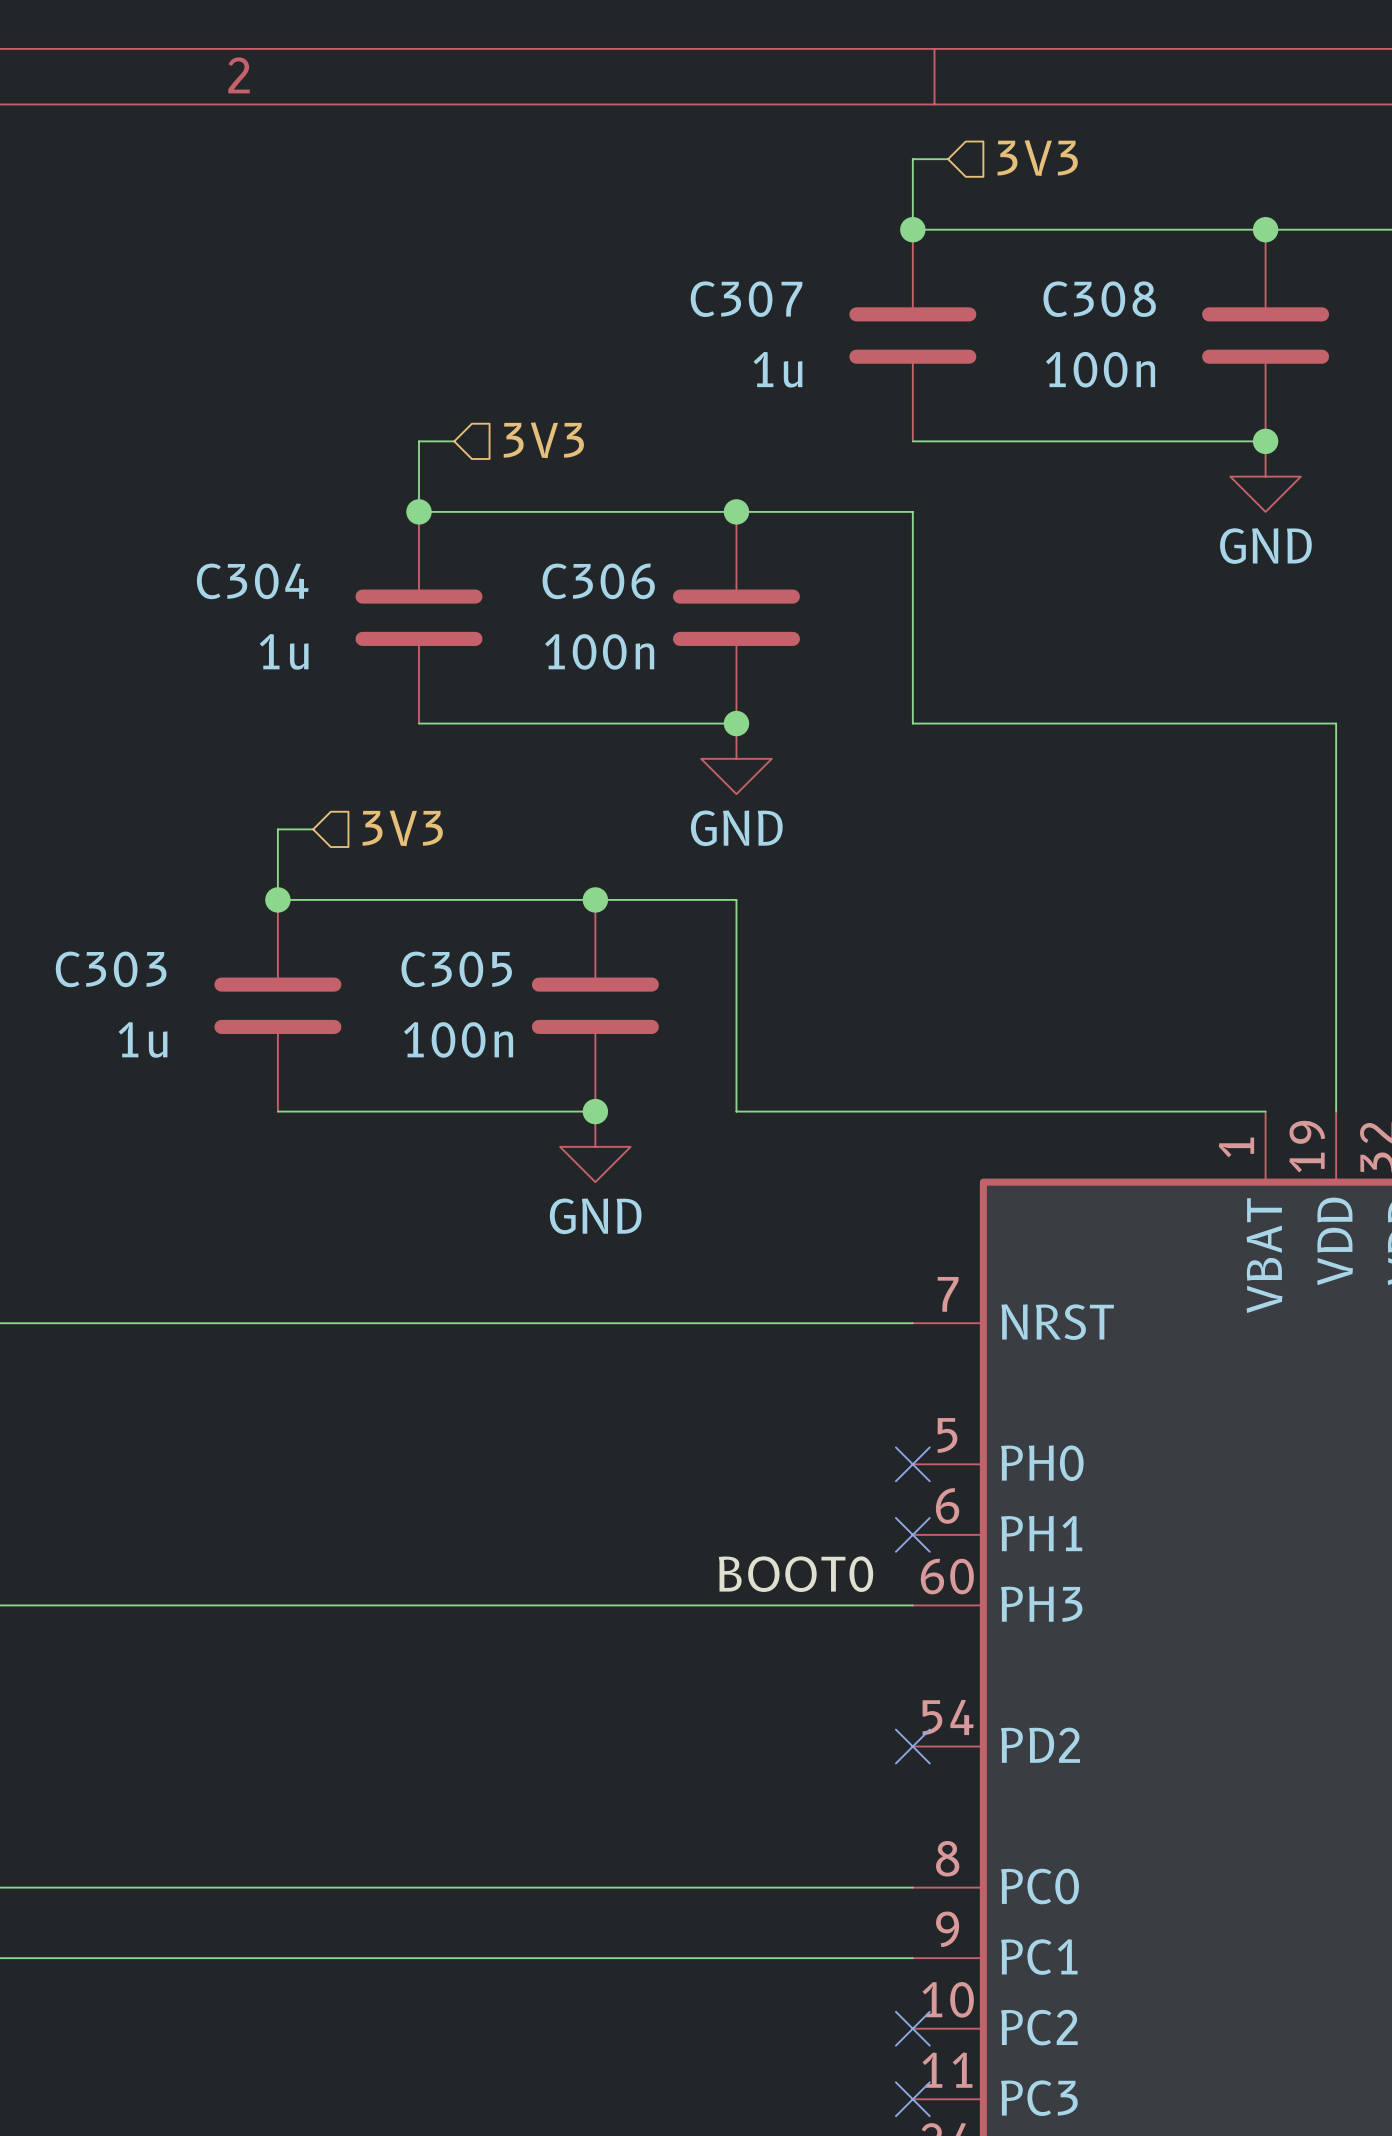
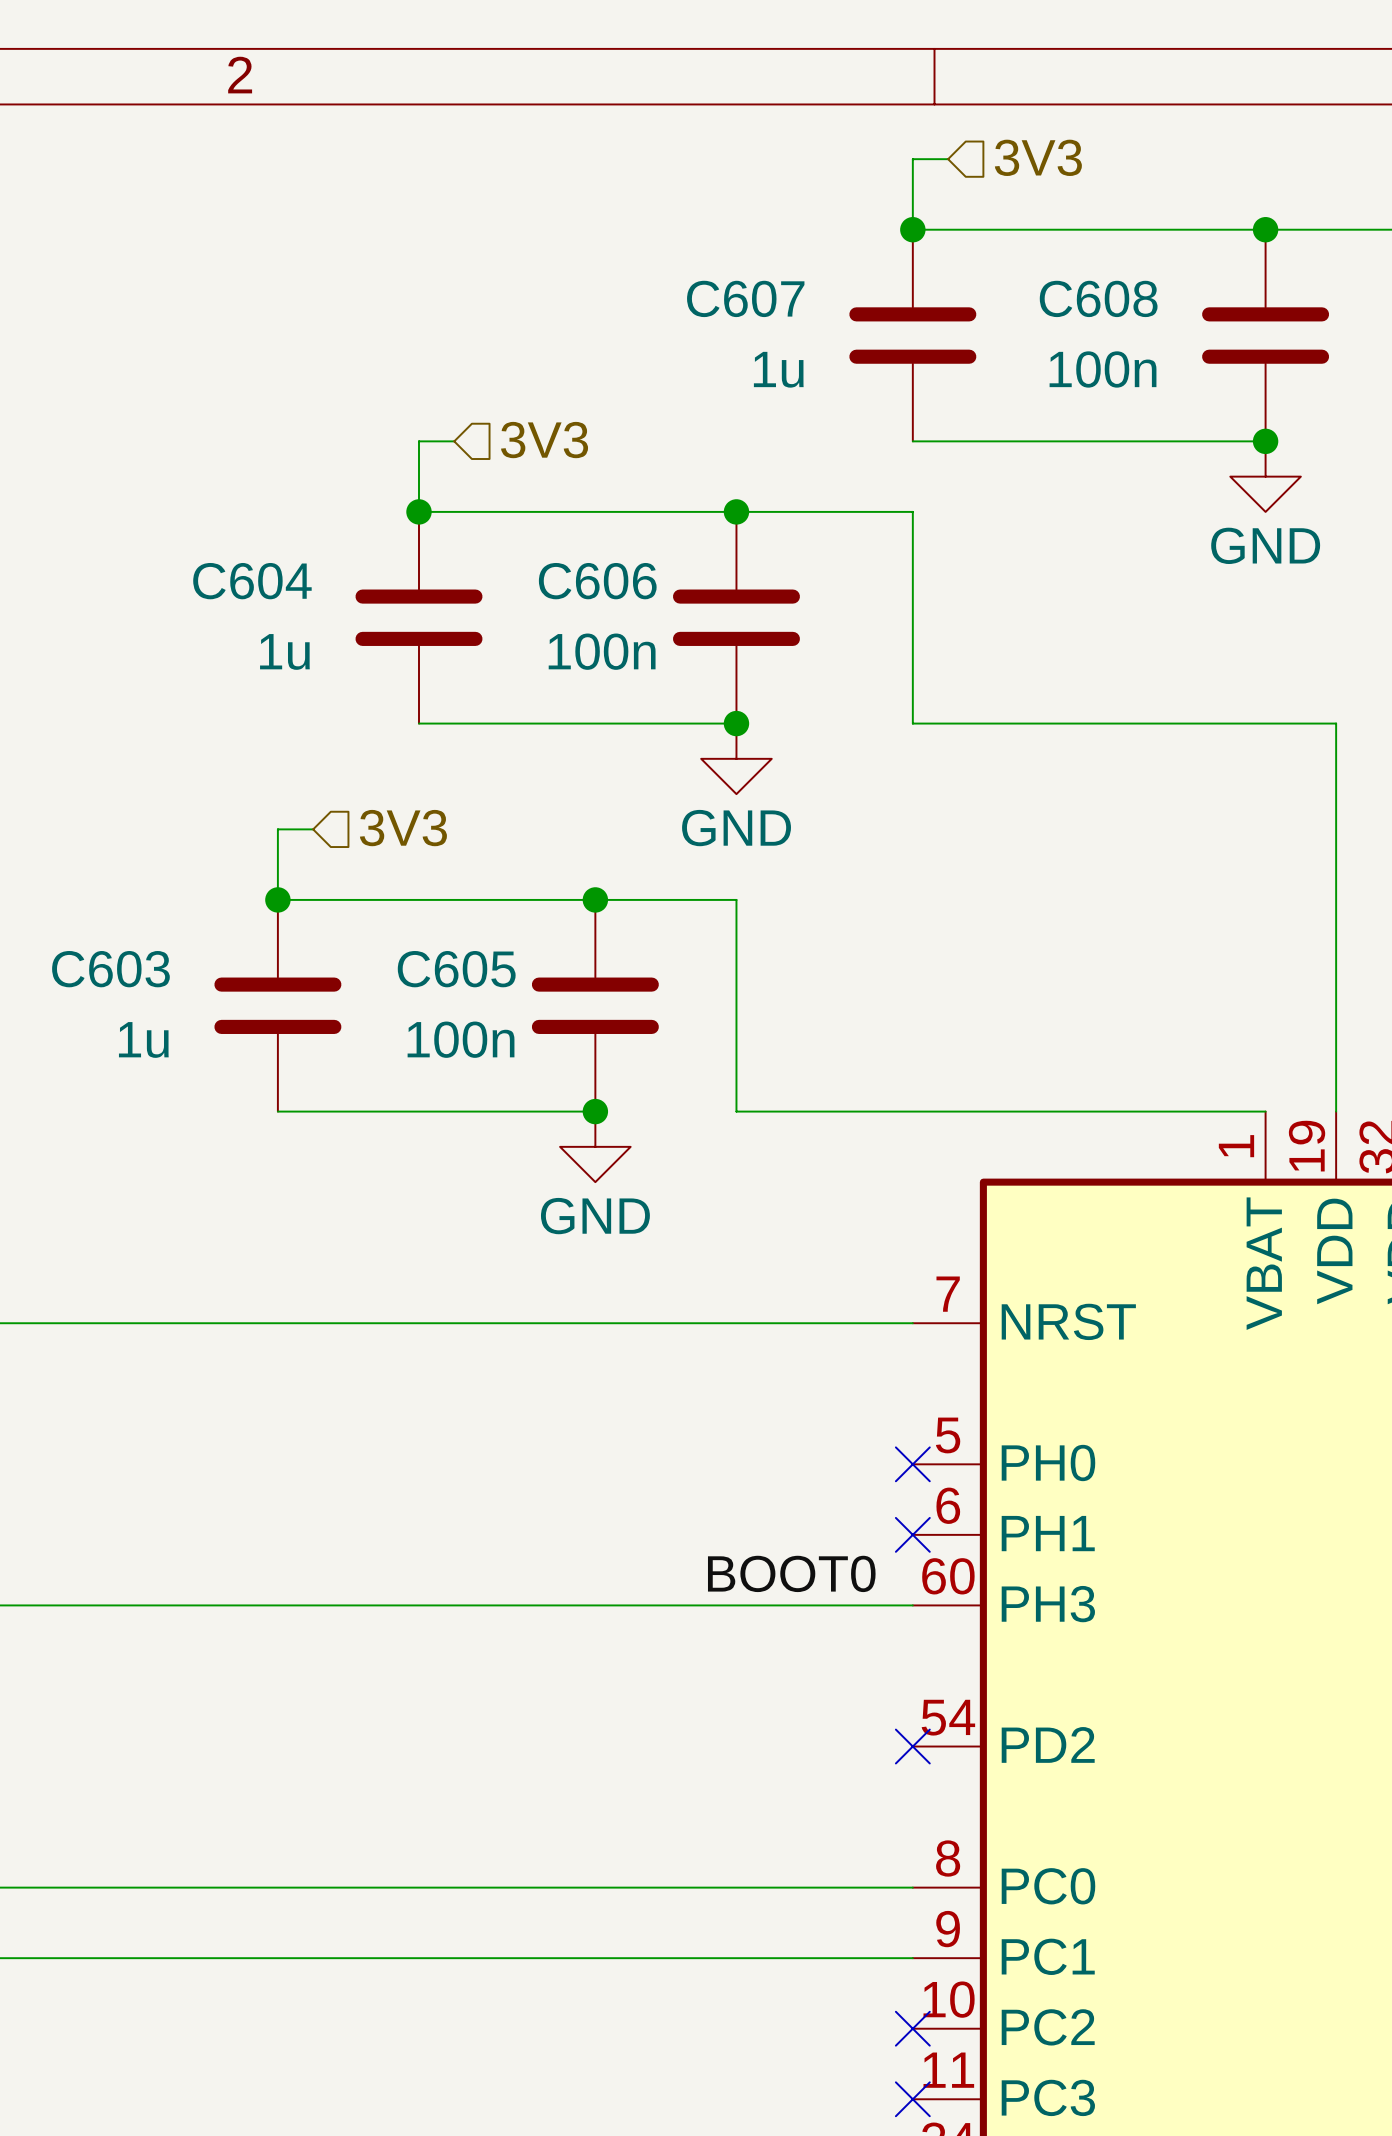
C307 name: C307 (746, 299) -> C607 (745, 298)
C308 name: C308 (1099, 299) -> C608 (1098, 298)
C304 name: C304 (252, 581) -> C604 (252, 581)
C306 name: C306 (598, 581) -> C606 (597, 581)
C303 name: C303 (111, 969) -> C603 (110, 969)
C305 name: C305 (456, 969) -> C605 (456, 969)

